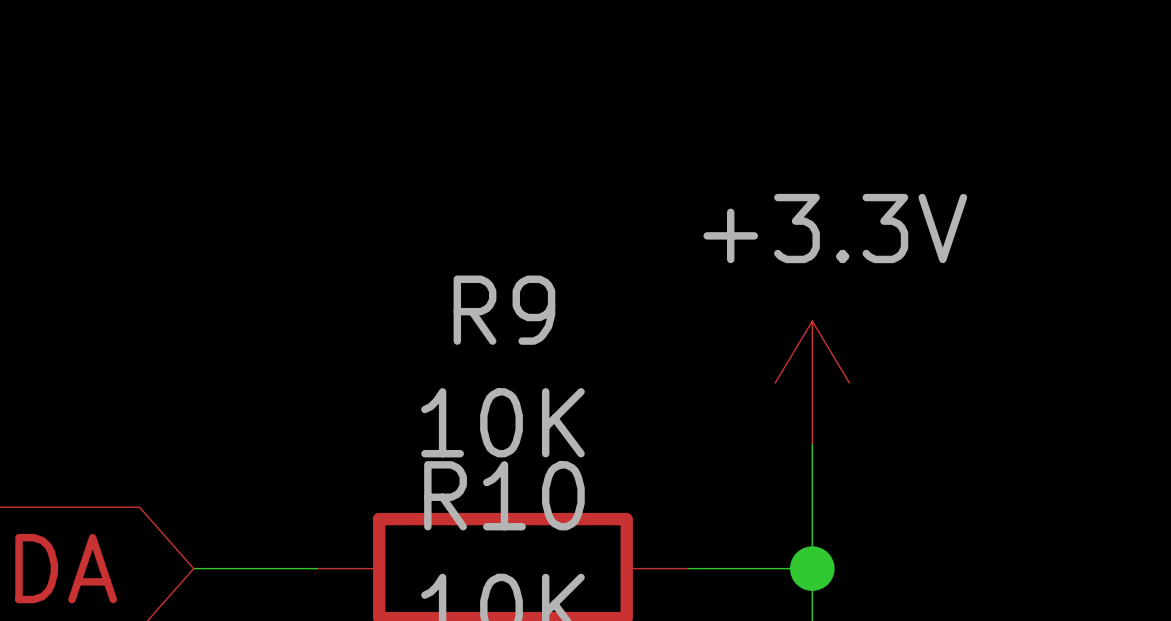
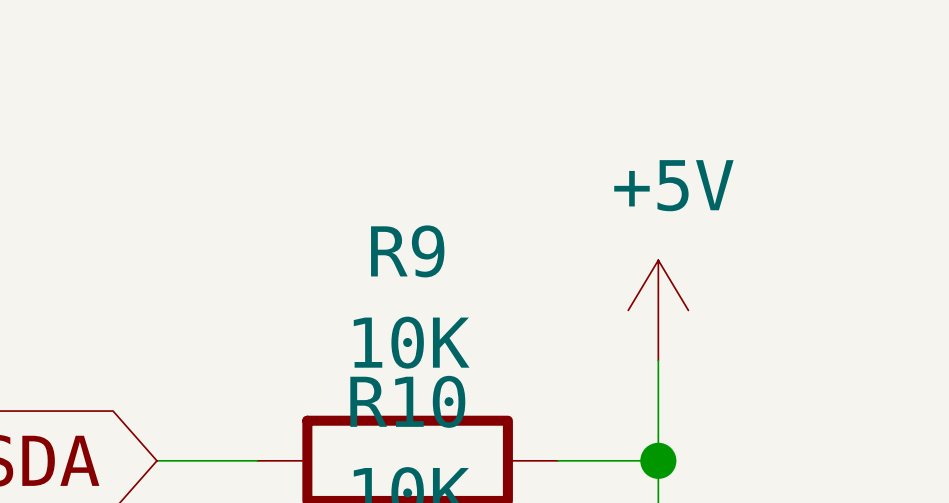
power symbol: +3.3V (812, 383) -> +5V (658, 310)

